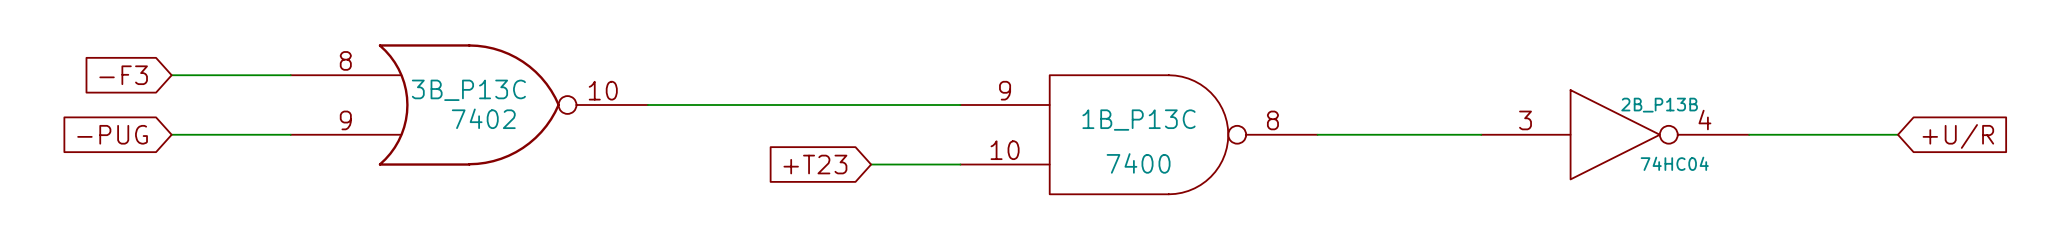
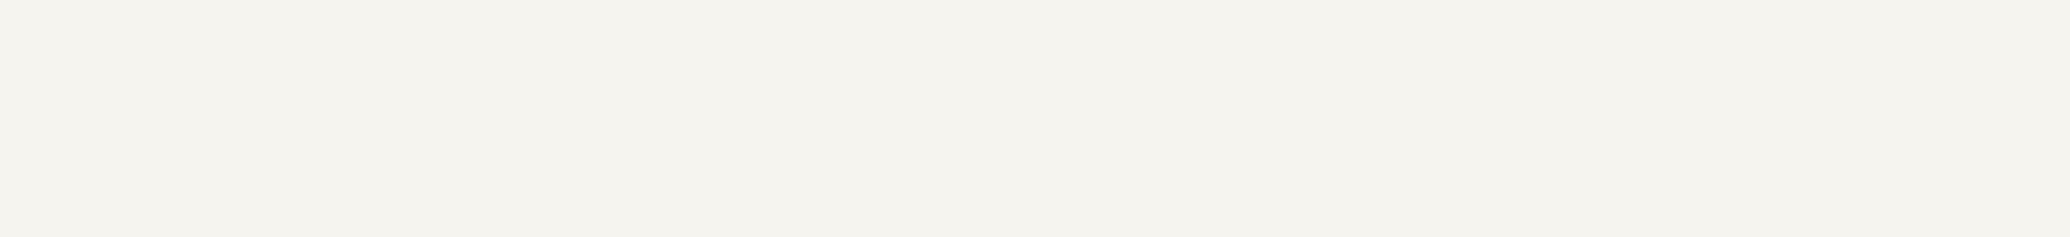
global label: -F3 (123, 75) -> none
wire: (171, 75) (290, 75) -> none
3B_P13C: 7402 (469, 104) -> none
wire: (647, 104) (960, 104) -> none
global label: -PUG (112, 134) -> none
wire: (171, 134) (290, 134) -> none
1B_P13C: 7400 (1139, 134) -> none
wire: (1317, 134) (1481, 134) -> none
2B_P13B: 74HC04 (1615, 134) -> none
wire: (1749, 134) (1897, 134) -> none
global label: +U/R (1958, 136) -> none
global label: +T23 (815, 164) -> none
wire: (871, 164) (960, 164) -> none

